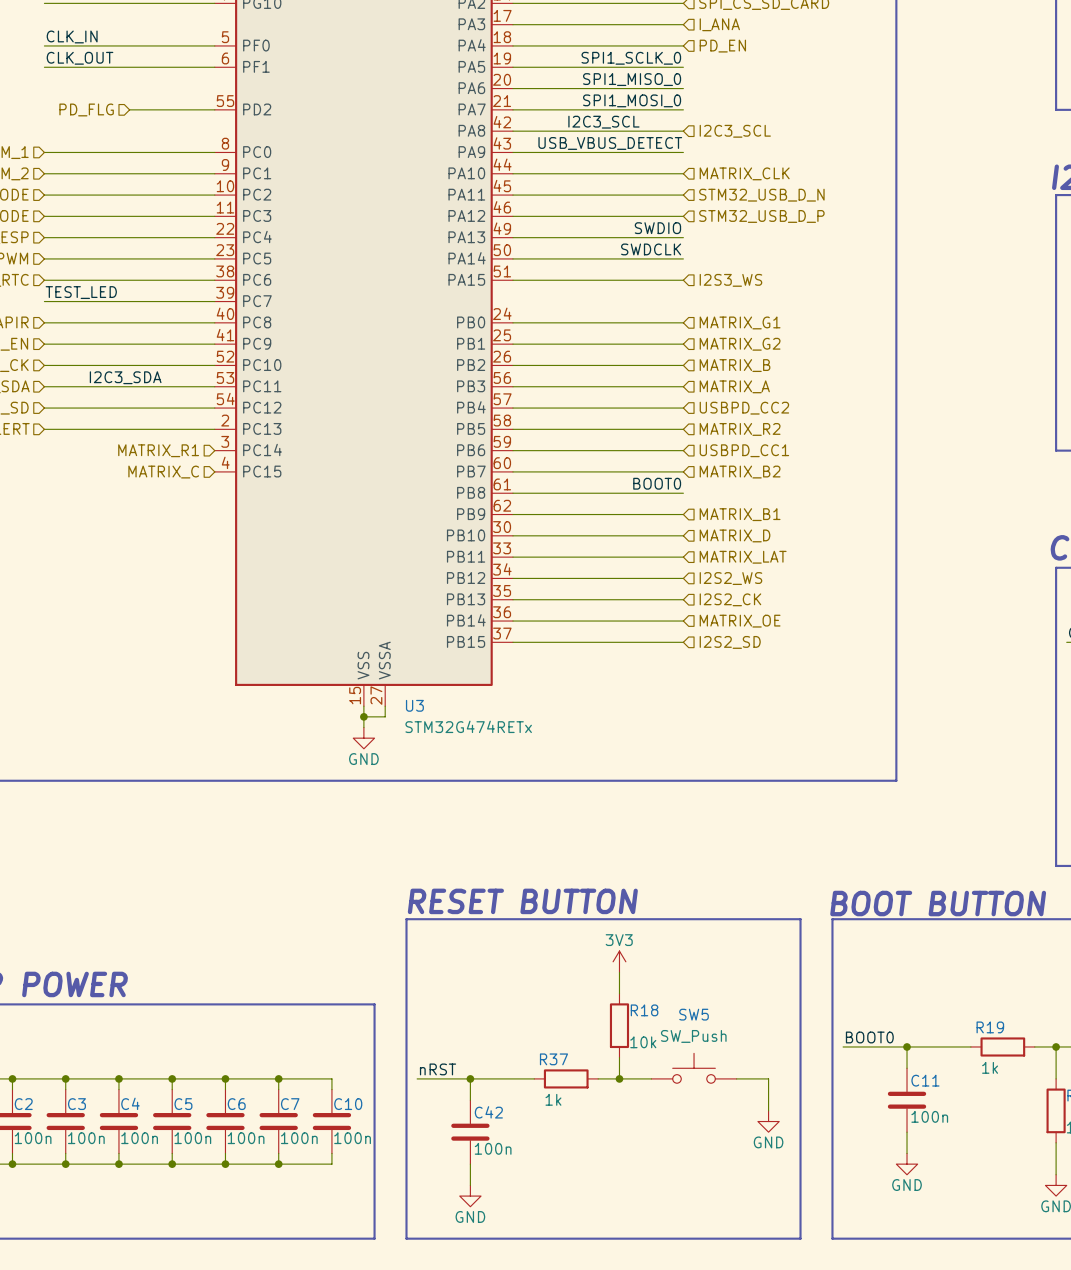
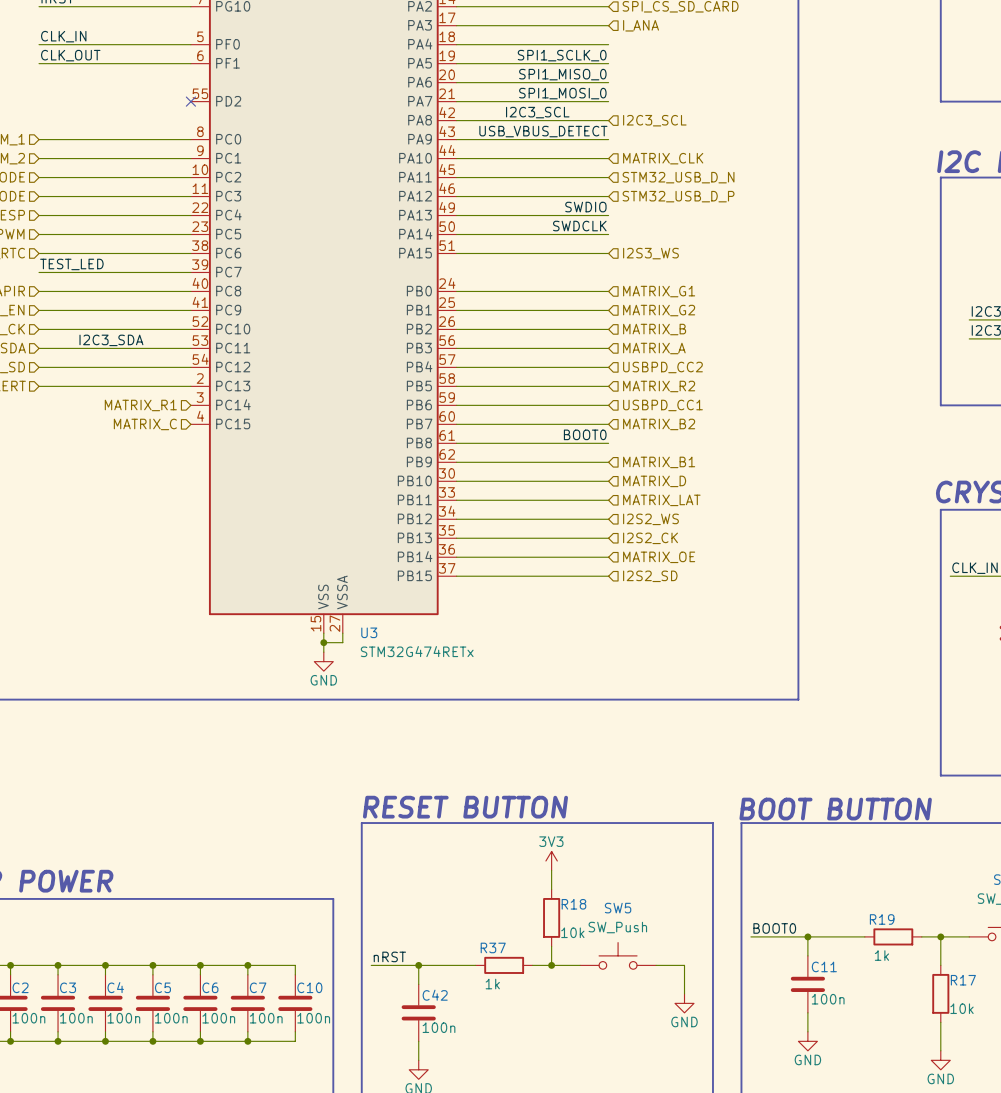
hierarchical label: PD_EN (722, 46) -> none
hierarchical label: PD_FLG (86, 109) -> none
wire: (129, 109) (214, 109) -> none
no-connect mark: none -> (190, 101)

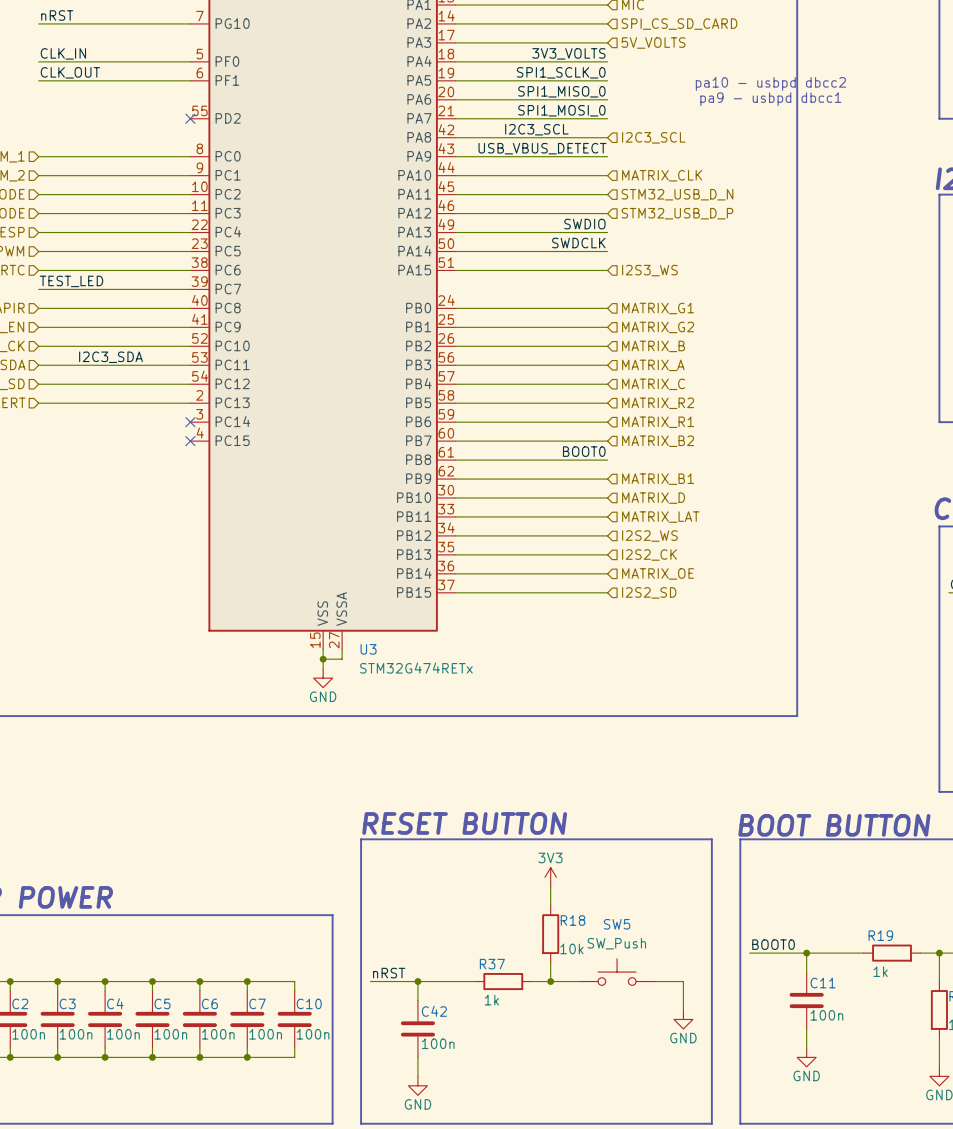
hierarchical label: I_ANA (641, 25) -> 5V_VOLTS (653, 43)
label: none -> 3V3_VOLTS (568, 53)
text: none -> pa10 - usbpd dbcc2 (770, 83)
text: none -> pa9 - usbpd dbcc1 (770, 99)
hierarchical label: USBPD_CC2 (662, 367) -> MATRIX_C (653, 384)
hierarchical label: MATRIX_R1 (140, 405) -> none
no-connect mark: none -> (190, 422)
hierarchical label: USBPD_CC1 (662, 405) -> MATRIX_R1 (658, 422)
hierarchical label: MATRIX_C (145, 424) -> none
no-connect mark: none -> (190, 441)

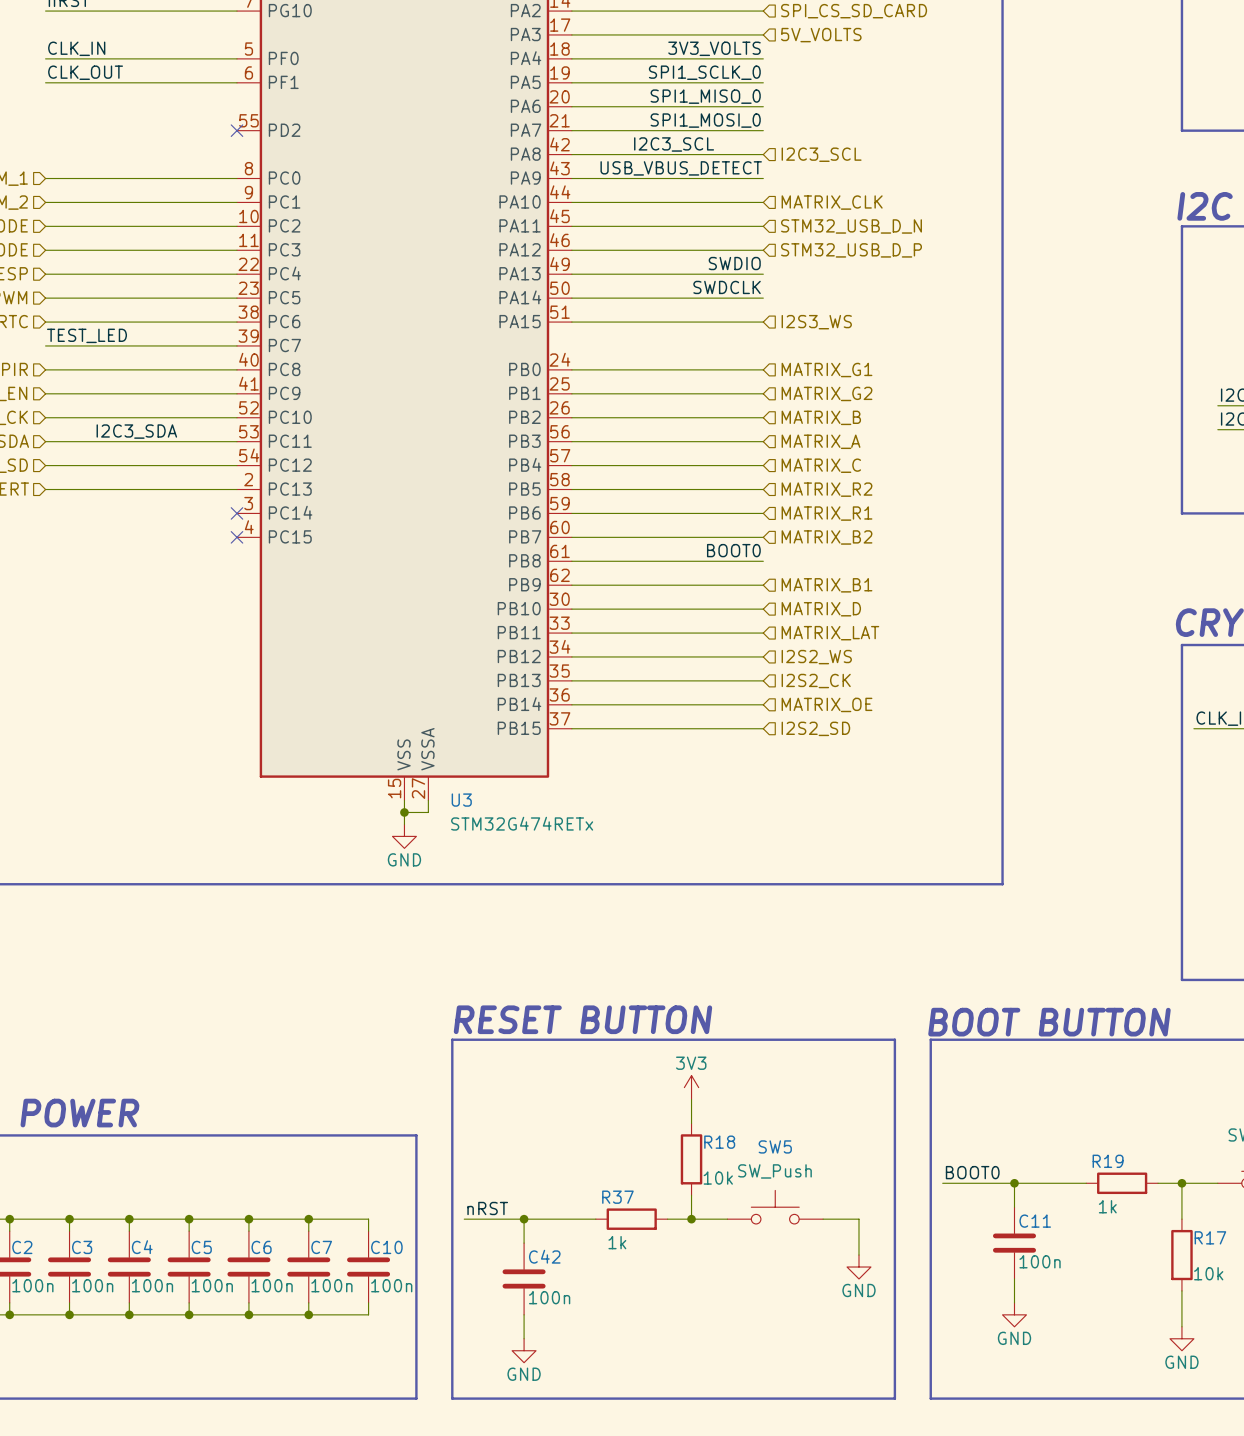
text: pa10 - usbpd dbcc2 (770, 83) -> none
text: pa9 - usbpd dbcc1 (770, 99) -> none

